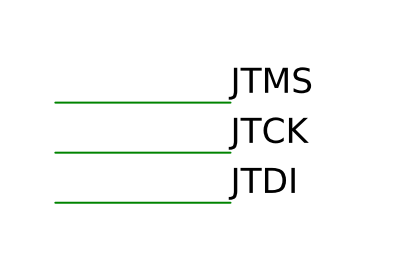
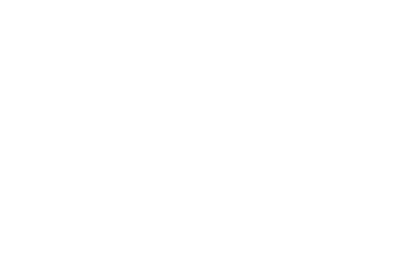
label: JTMS (269, 83) -> none
wire: (55, 102) (230, 102) -> none
label: JTCK (268, 133) -> none
wire: (55, 152) (230, 152) -> none
label: JTDI (261, 183) -> none
wire: (55, 202) (230, 202) -> none

